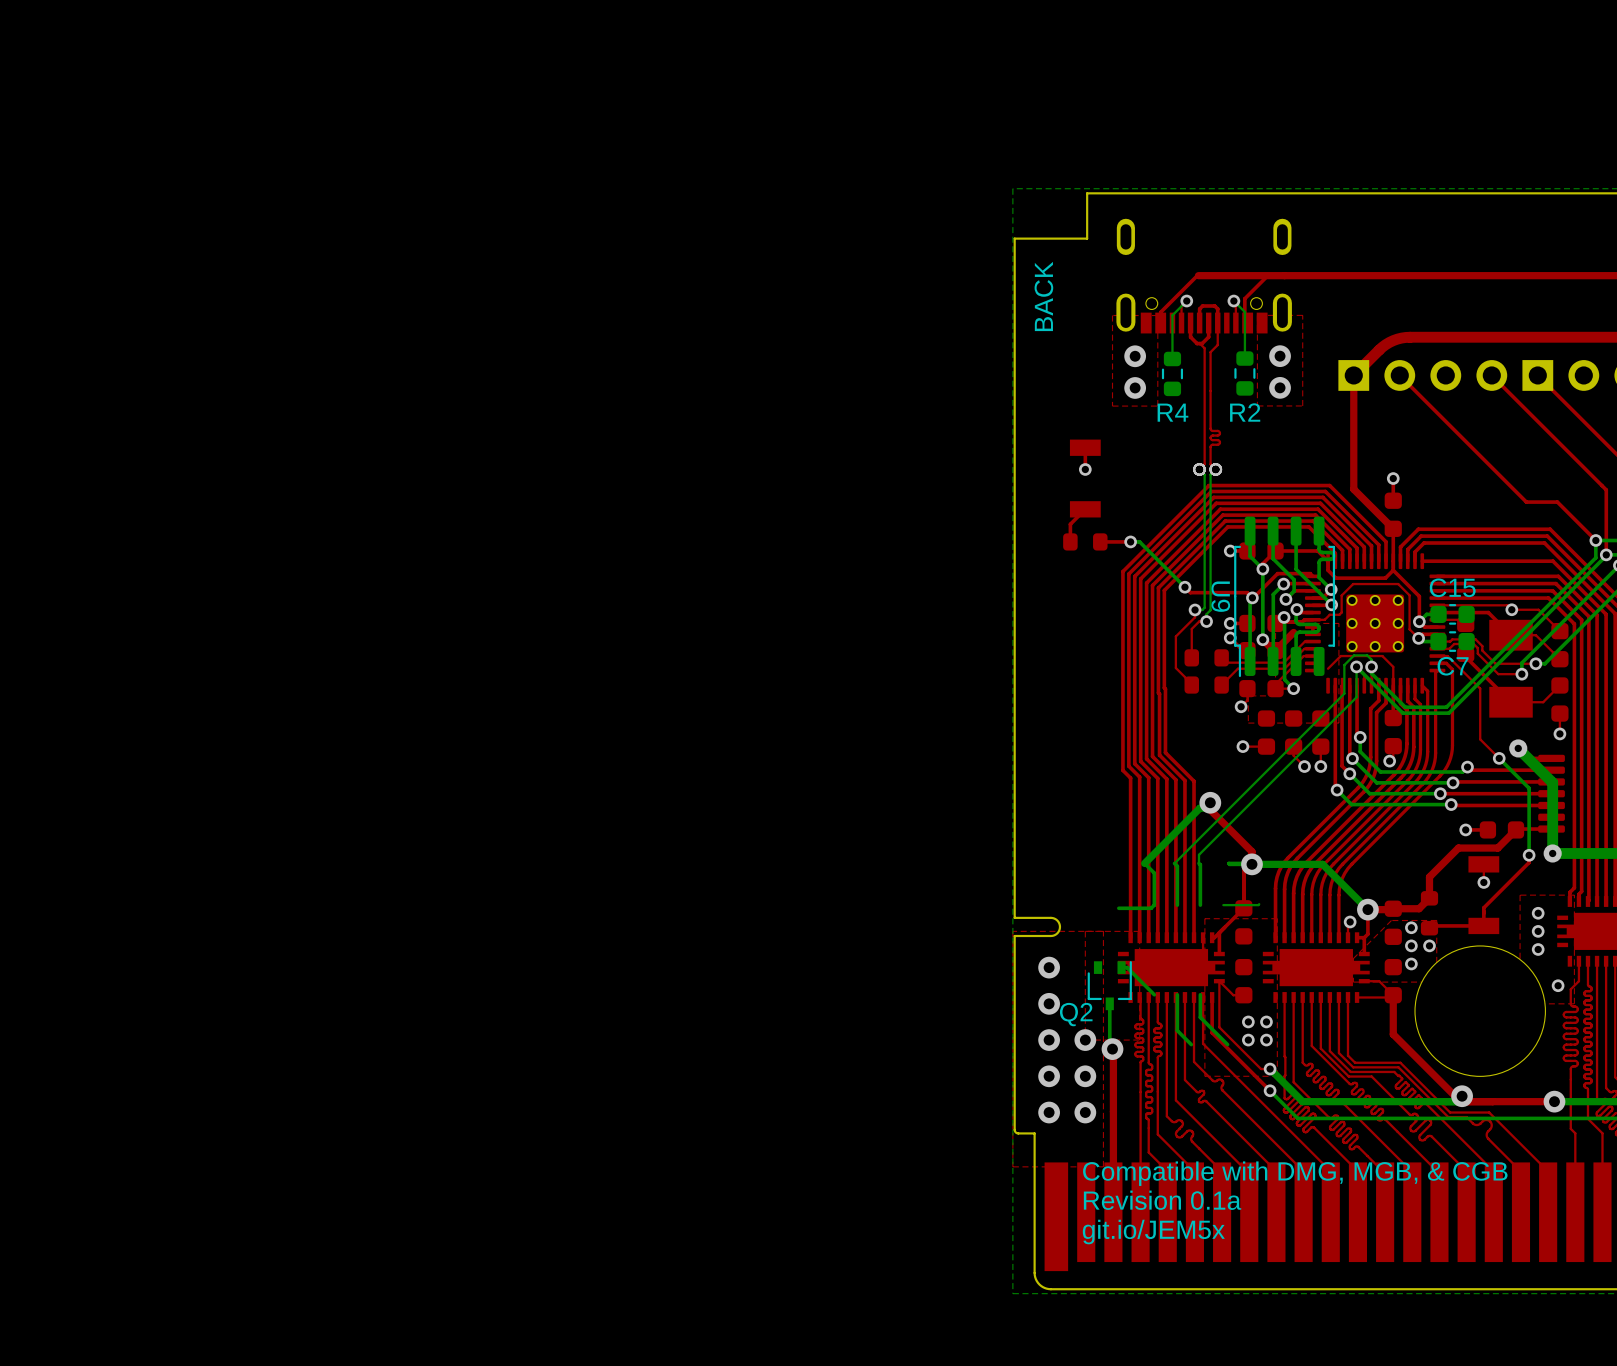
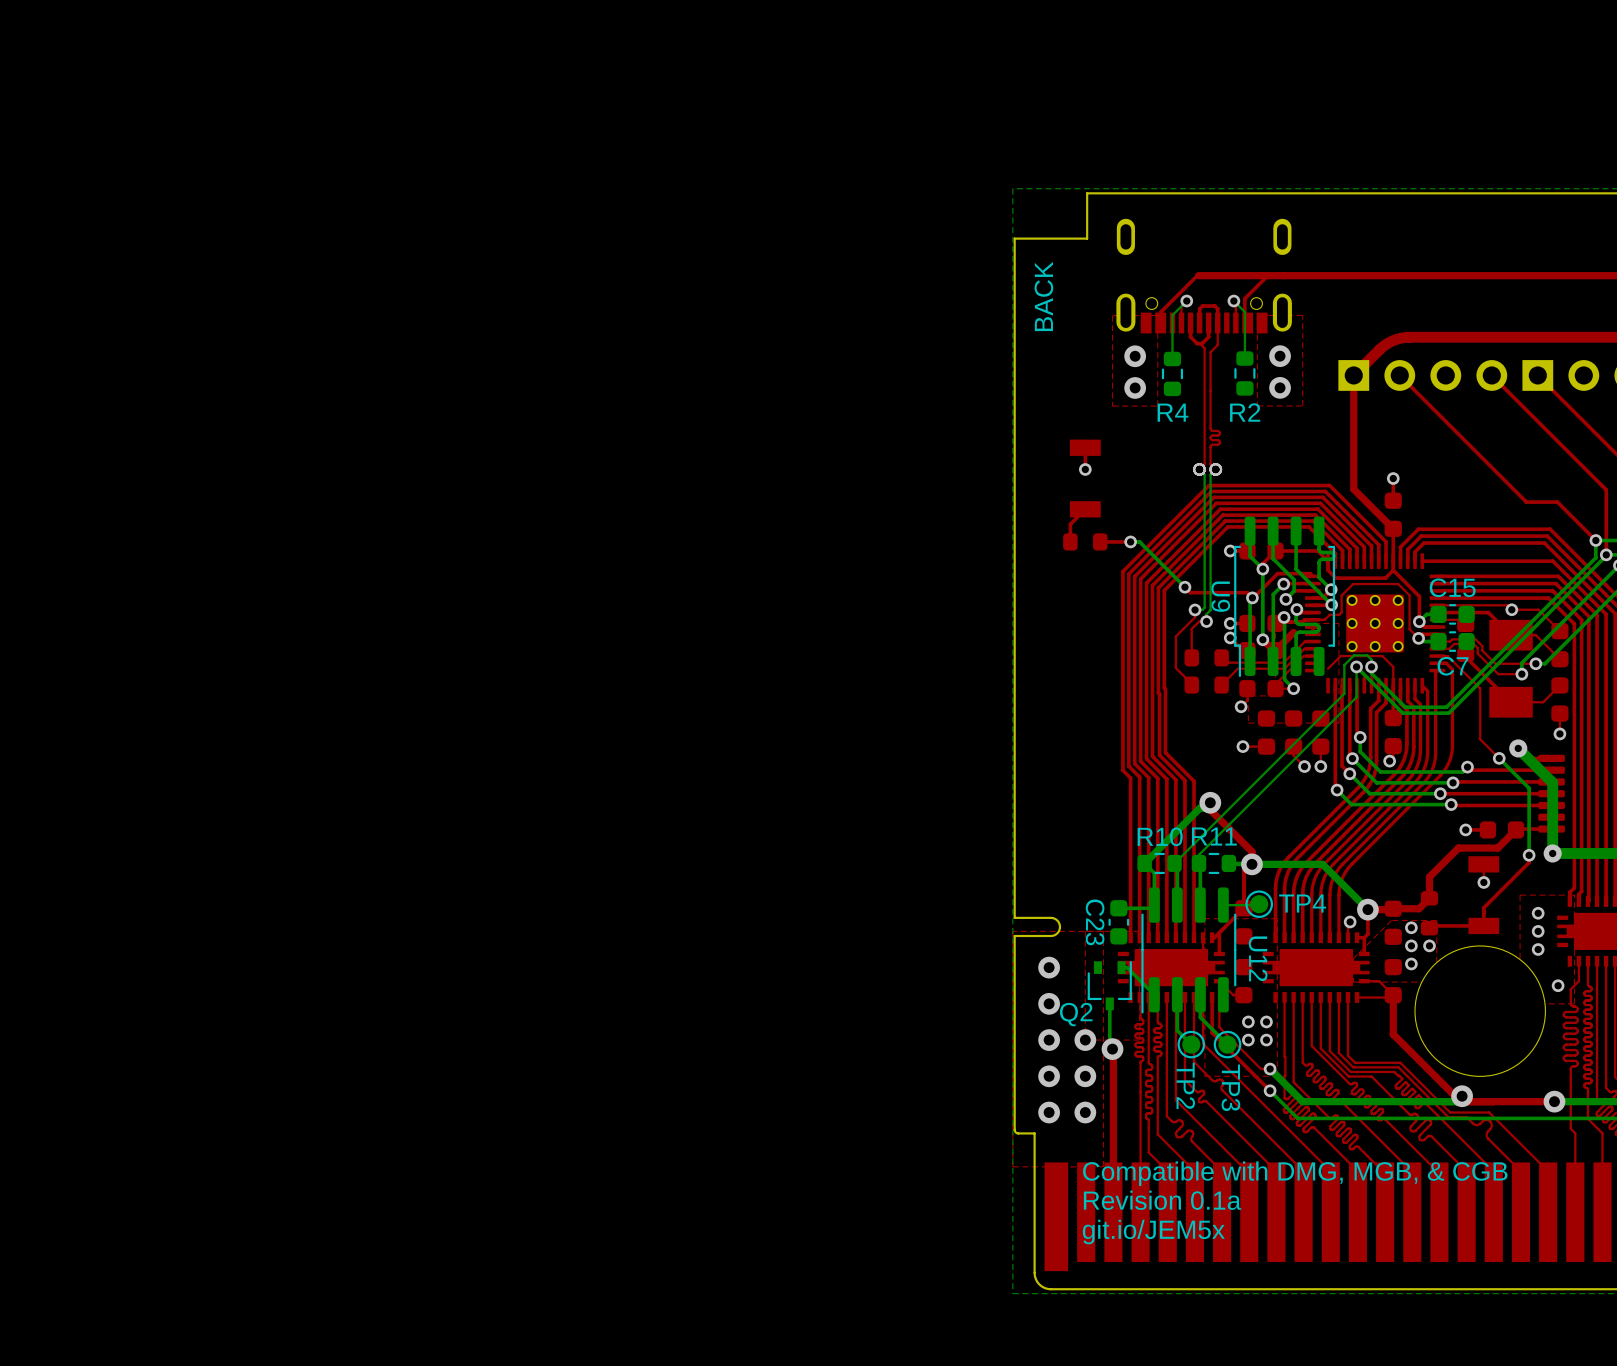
R10: none -> (1159, 863)
R11: none -> (1213, 863)
TP4: none -> (1259, 904)
C23: none -> (1118, 922)
U12: none -> (1188, 950)
TP2: none -> (1191, 1044)
TP3: none -> (1227, 1044)

